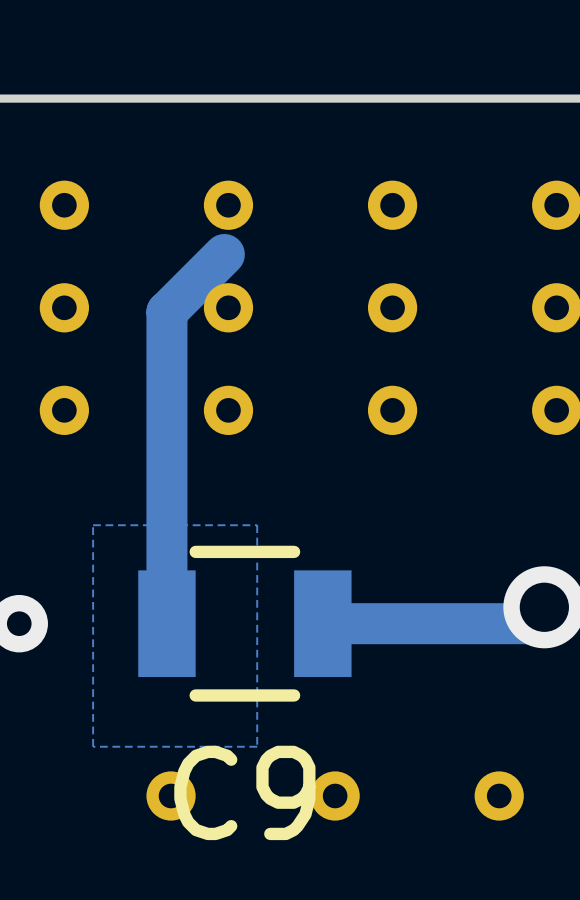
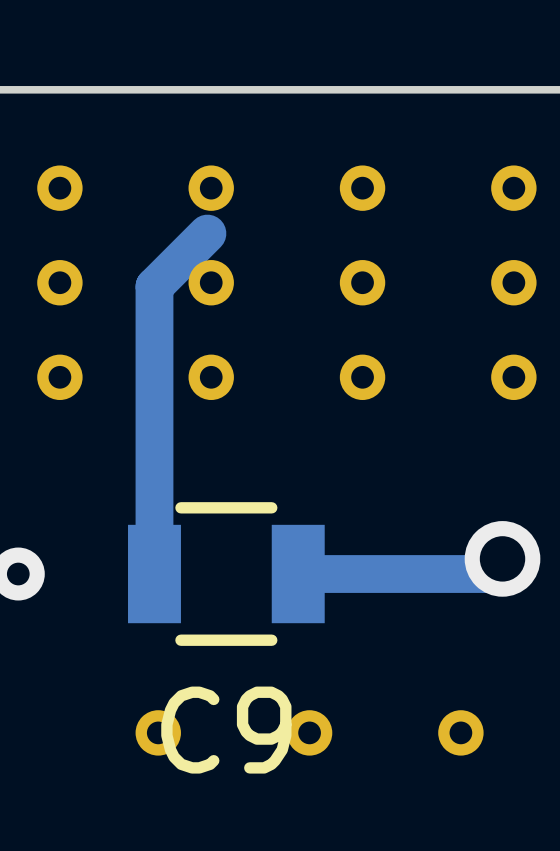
zone outline: (257, 525) (257, 746) (93, 746) (93, 525) (257, 525) -> none

